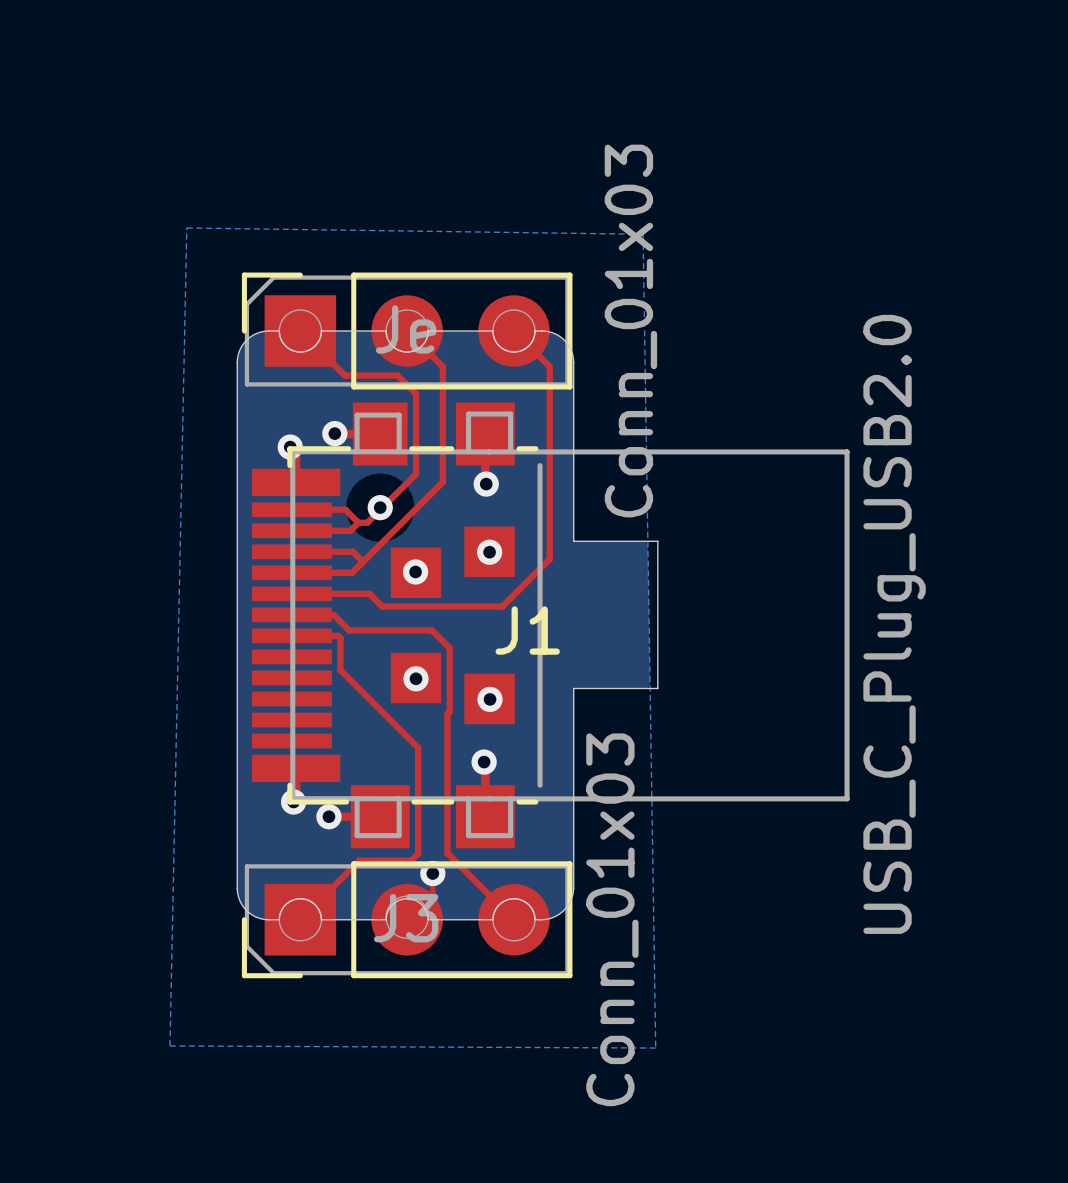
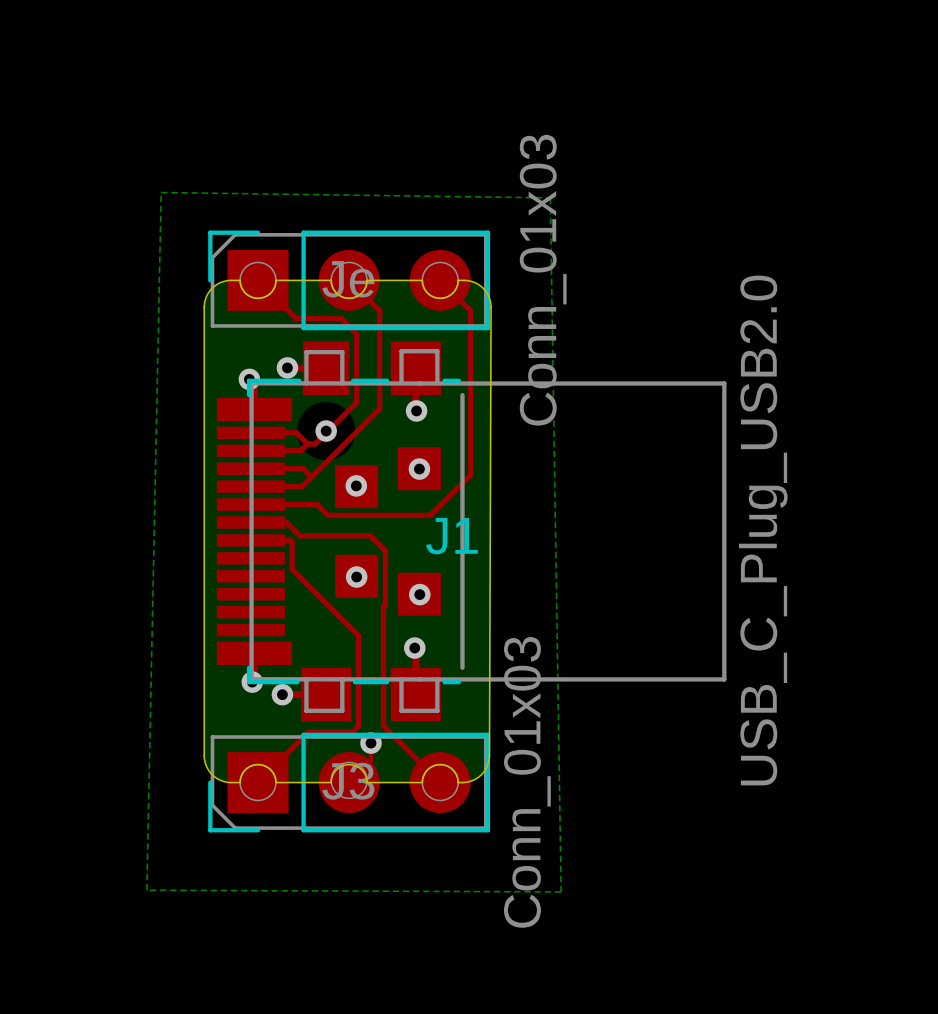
board edge: (542, 331) (555, 334) (564, 340) (570, 348) (573, 359) (573, 541) (657, 541) (657, 688) (573, 688) (573, 892) (568, 904) (560, 913) (548, 918) (540, 919) -> (464, 280) (473, 281) (483, 288) (488, 295) (491, 307) (489, 755) (487, 766) (481, 774) (472, 780) (462, 782)

